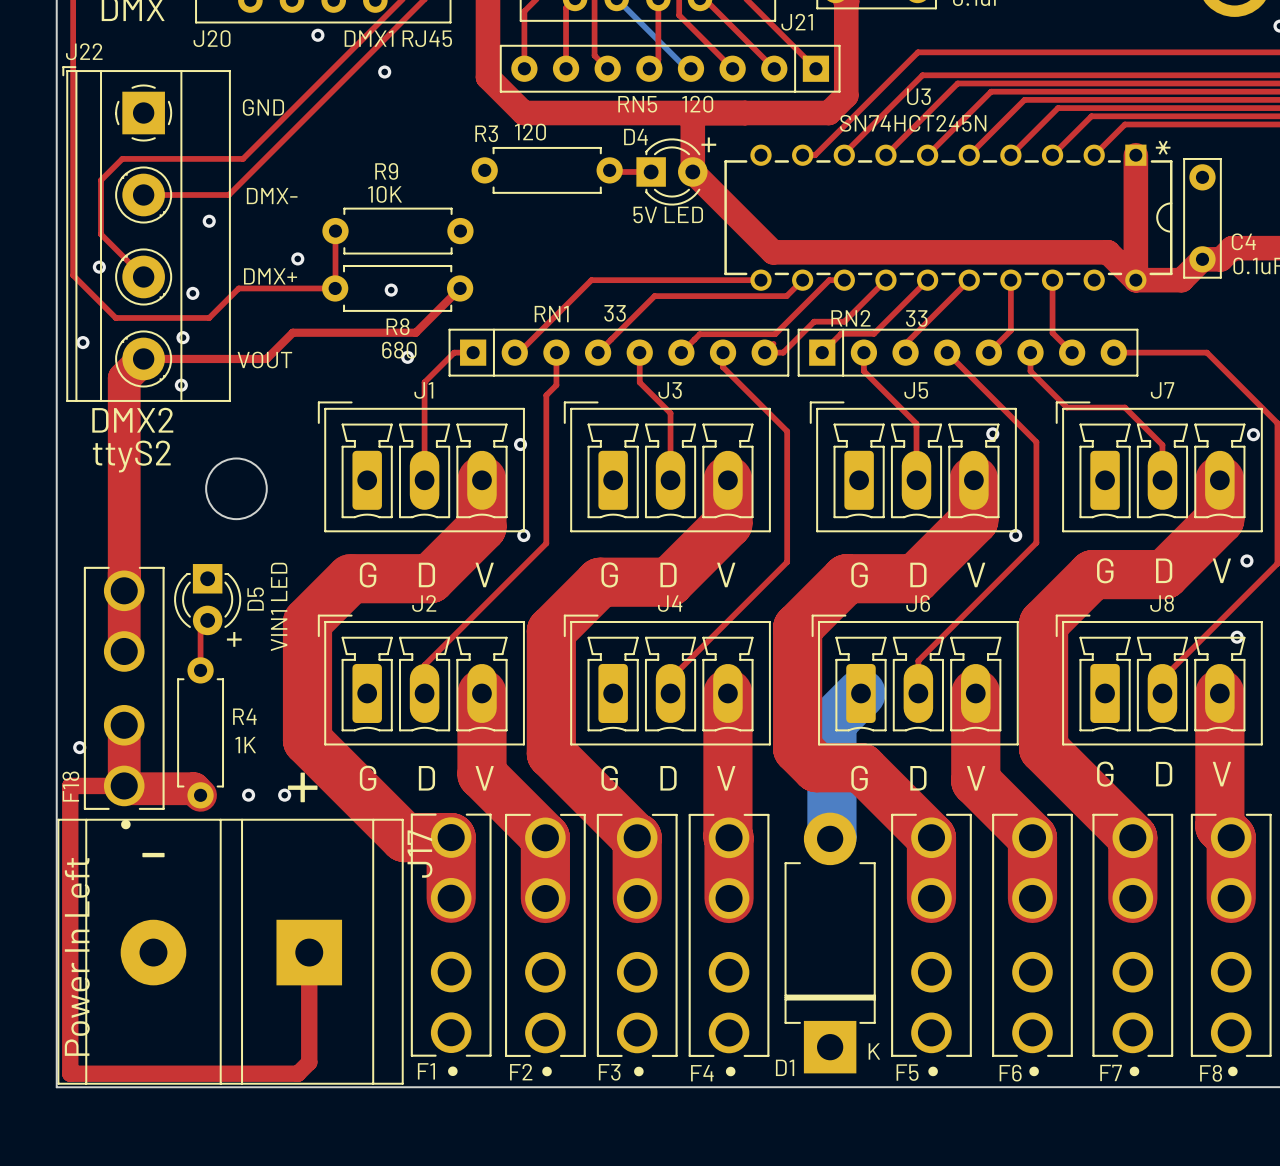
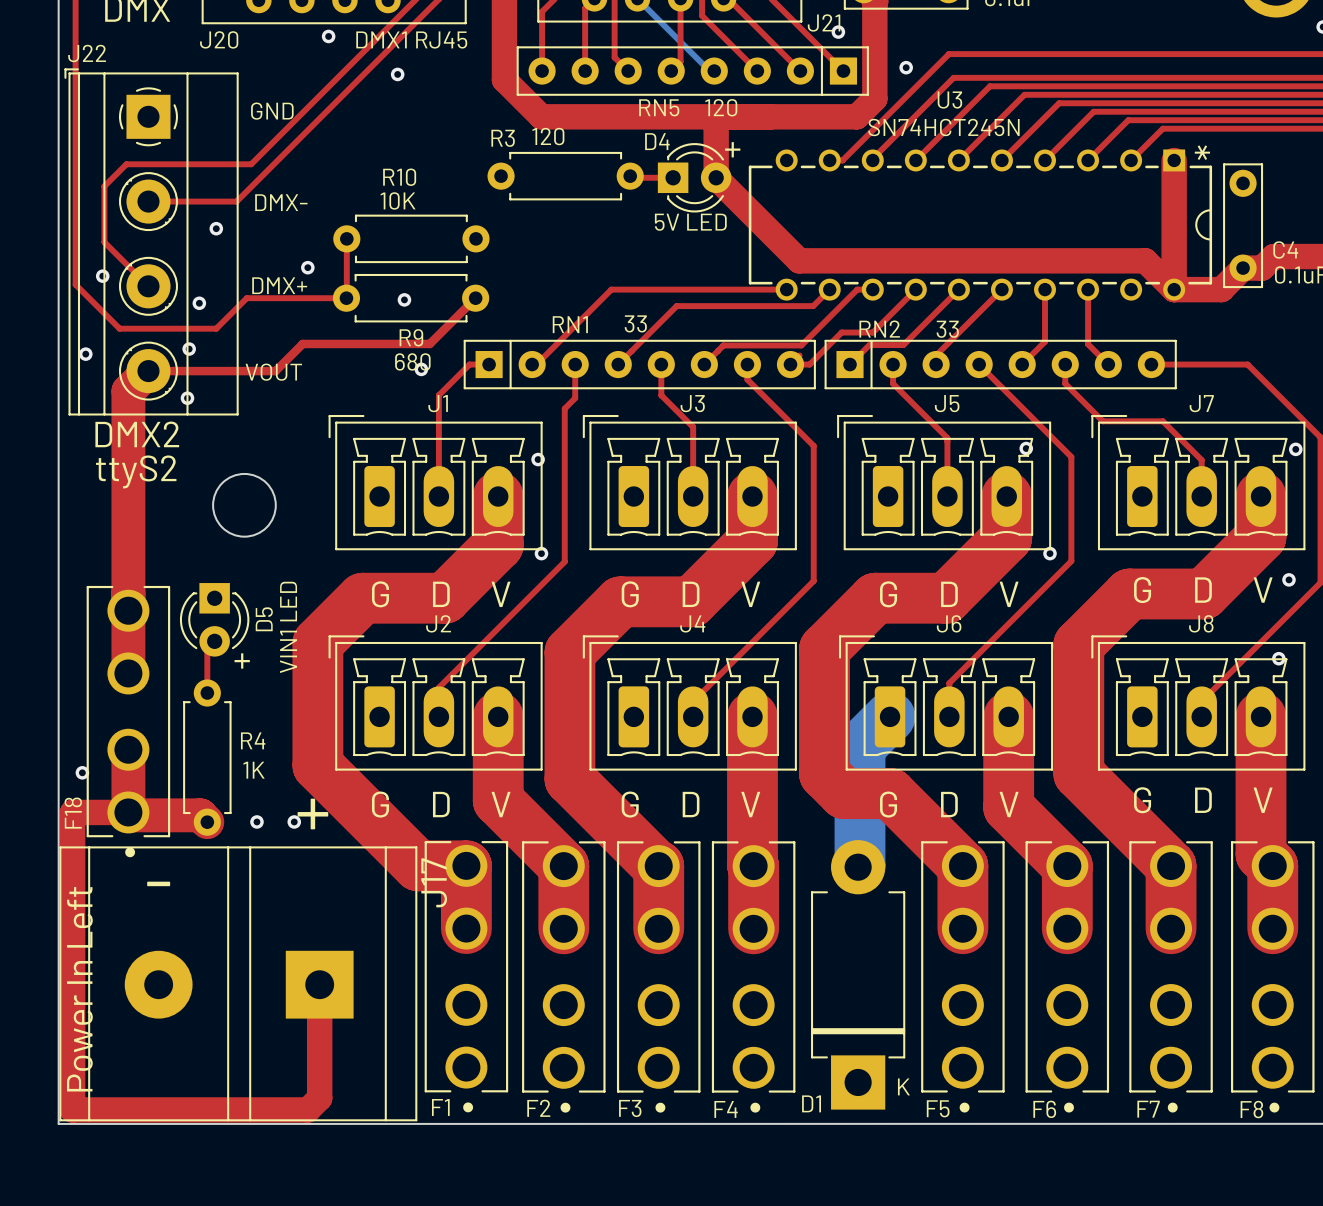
via: none -> (838, 32)
via: none -> (906, 67)
R9 name: R9 (386, 171) -> R10 (399, 177)
R8 name: R8 (398, 326) -> R9 (411, 337)
top track width: thin (124, 785) (70, 785) (70, 1073) (297, 1073) (309, 1062) (309, 952) -> thick (128, 812) (72, 812) (72, 1109) (308, 1109) (319, 1098) (319, 984)

